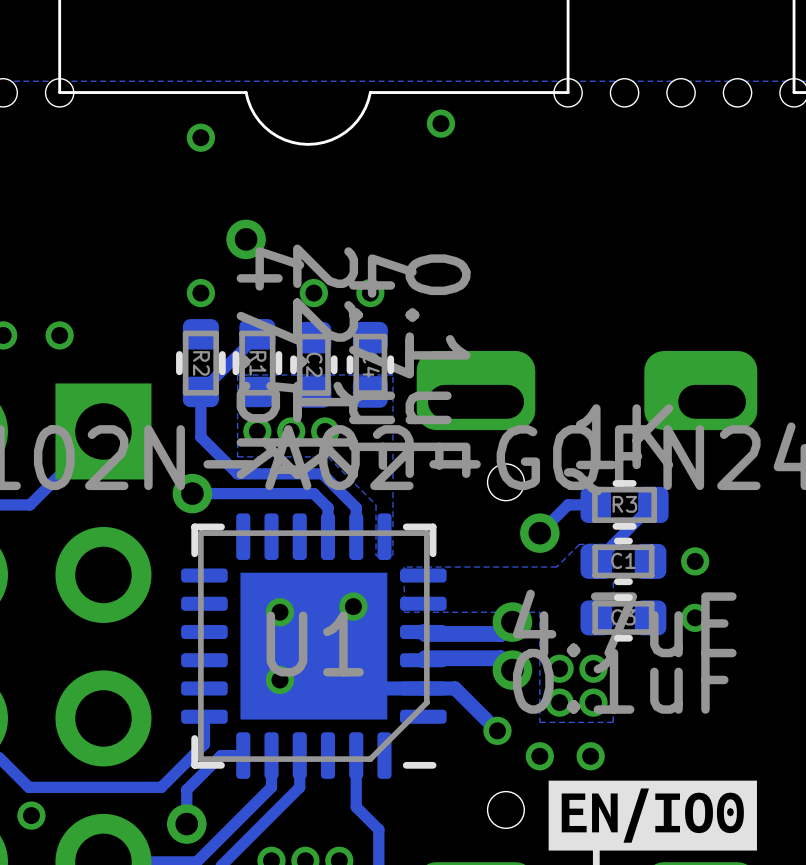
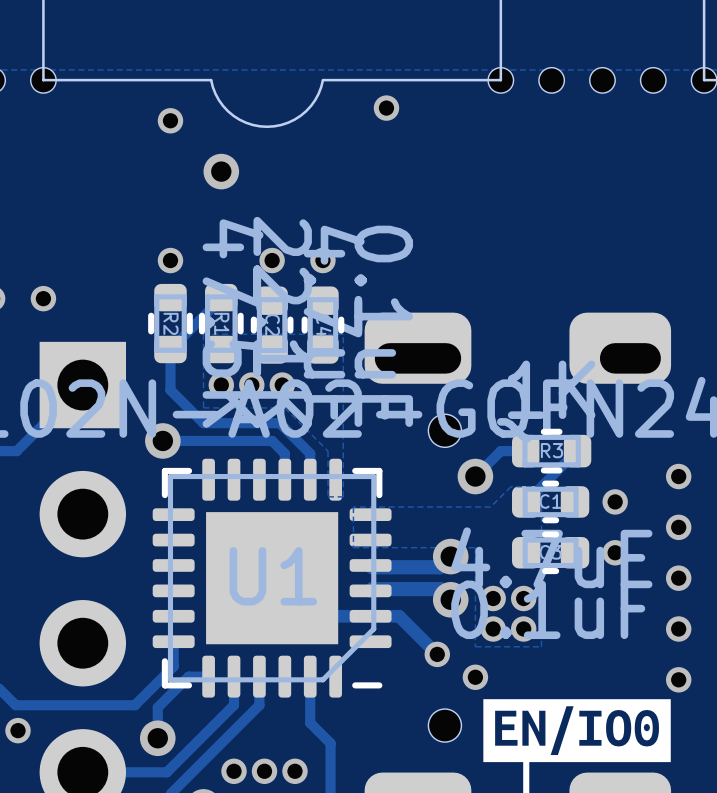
via position: (246, 239) -> (221, 171)
via: none -> (678, 476)
via: none -> (678, 527)
via: (353, 606) -> none
via: (279, 612) -> none
via: none -> (678, 578)
via: (279, 680) -> none
via: none -> (678, 628)
via: (590, 756) -> none
via: none -> (678, 679)

